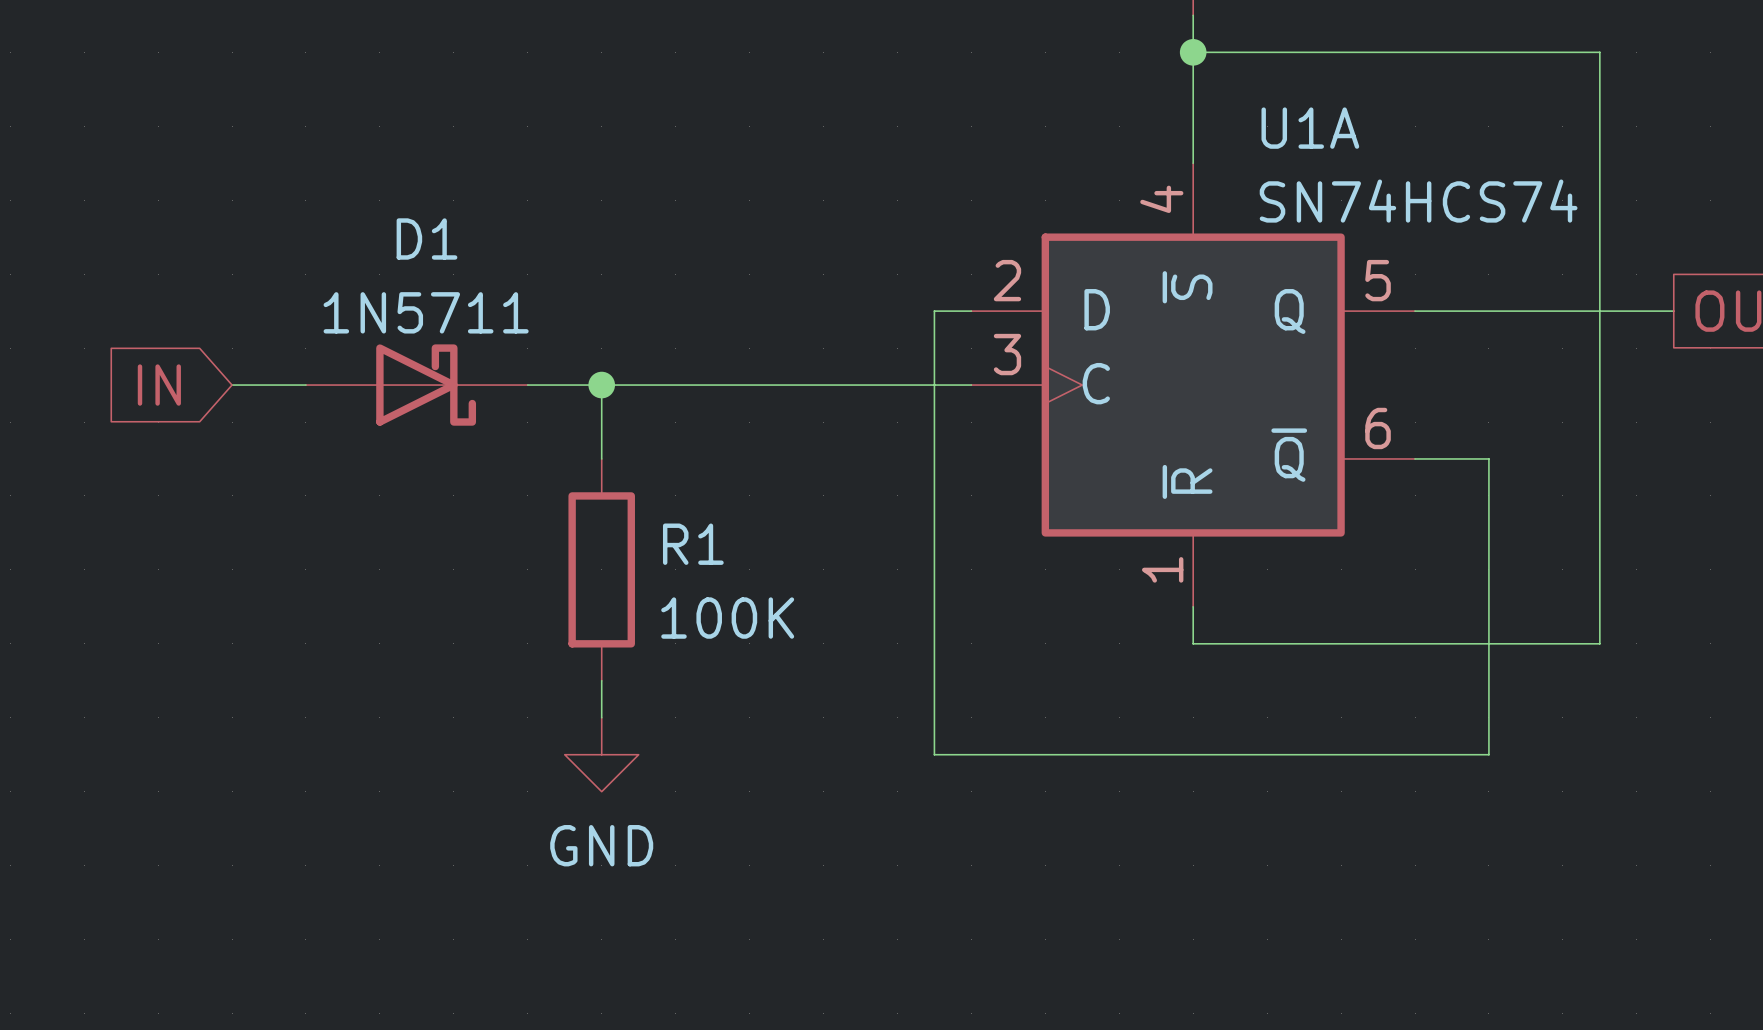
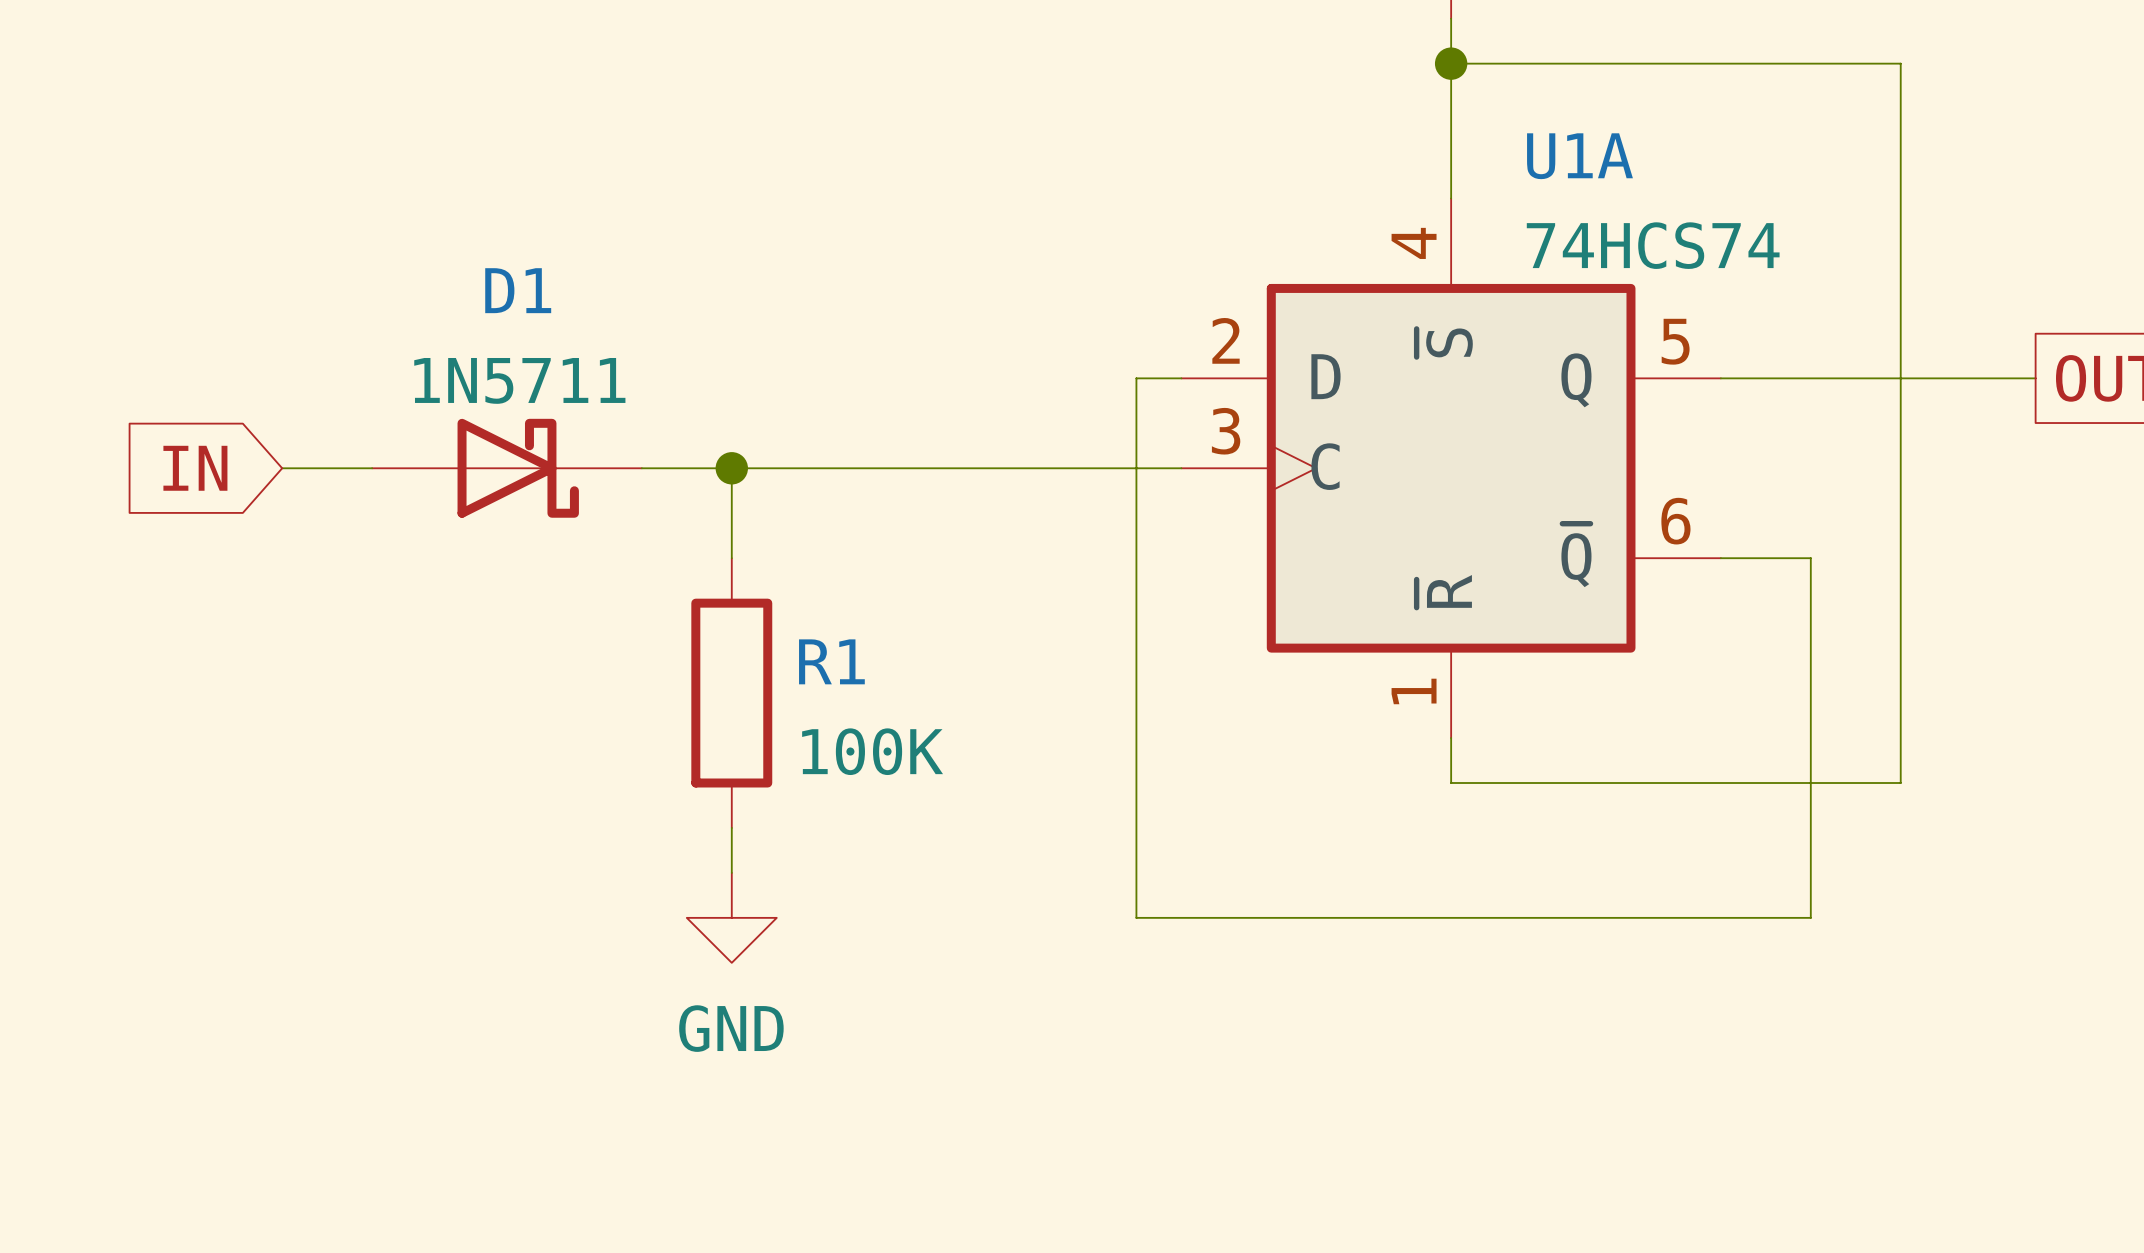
wire: (1562, 52) (1599, 52) (1599, 643) (1562, 643) -> (1900, 63) (1900, 783)
U1A value: SN74HCS74 (1418, 201) -> 74HCS74 (1653, 245)

